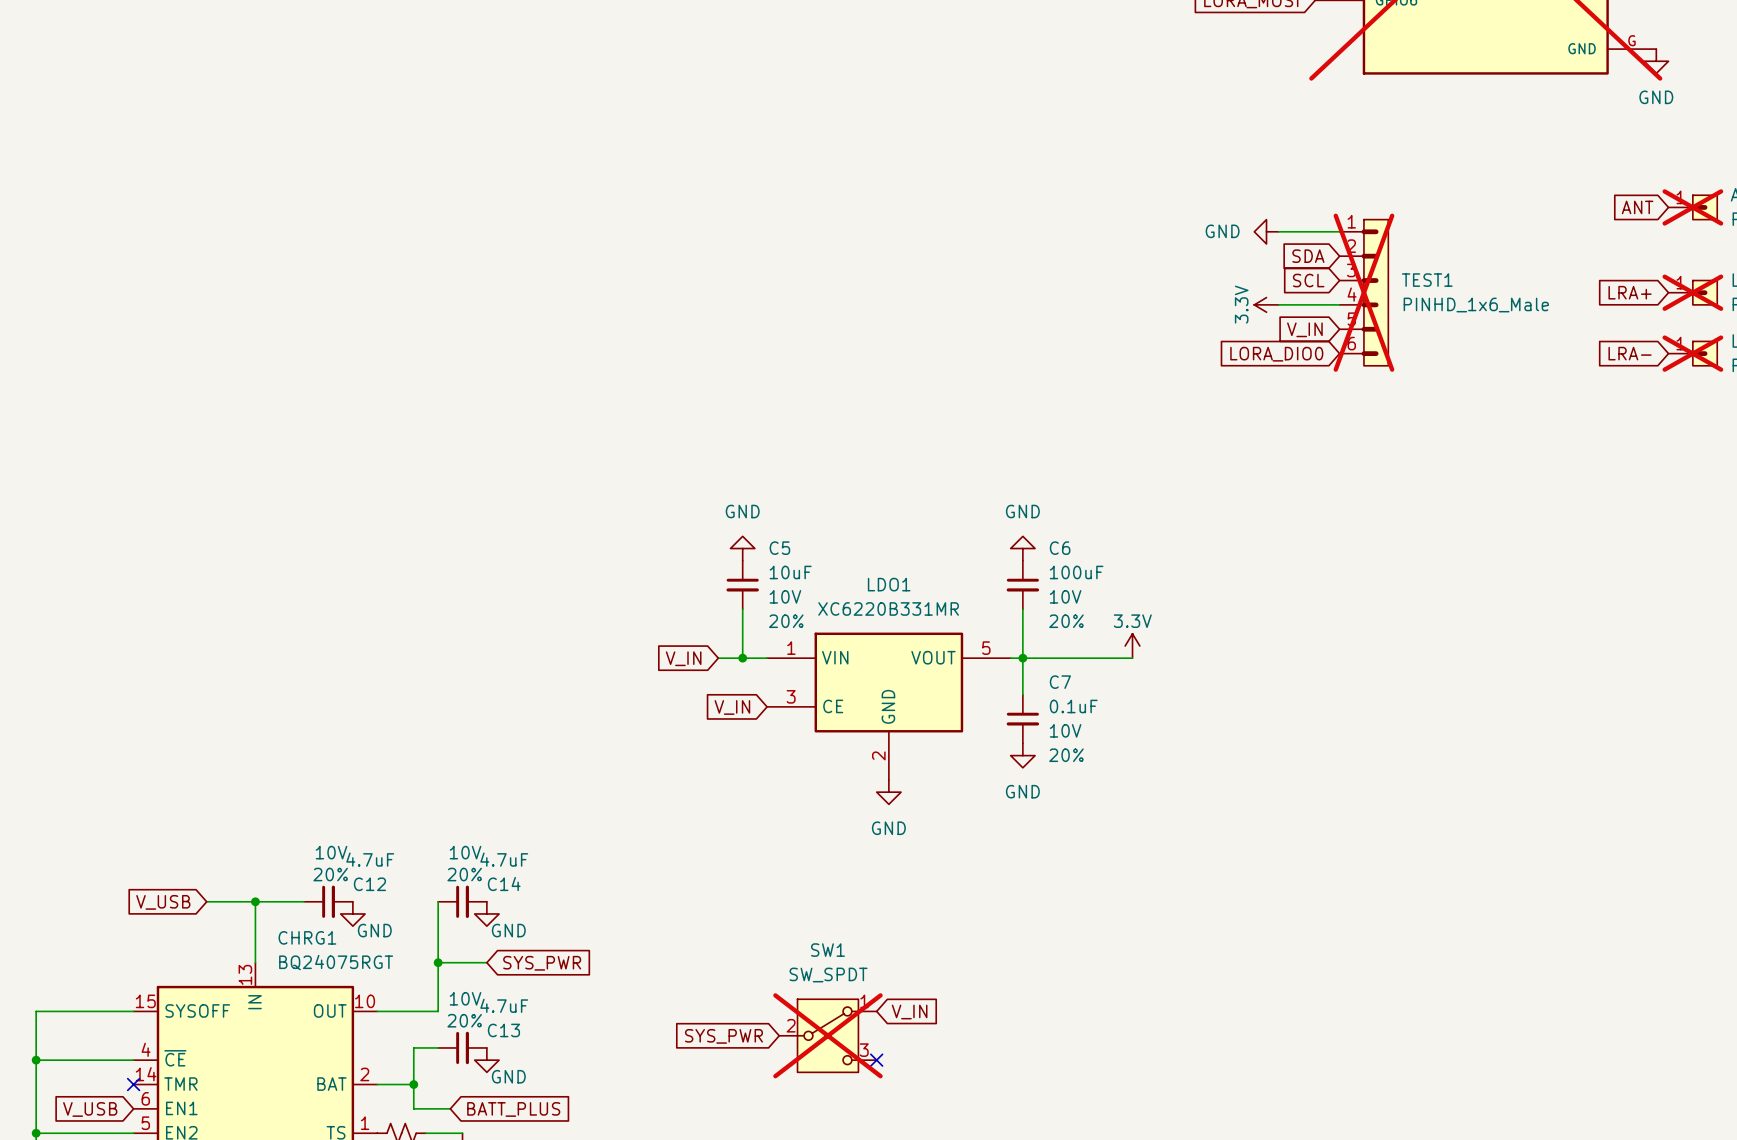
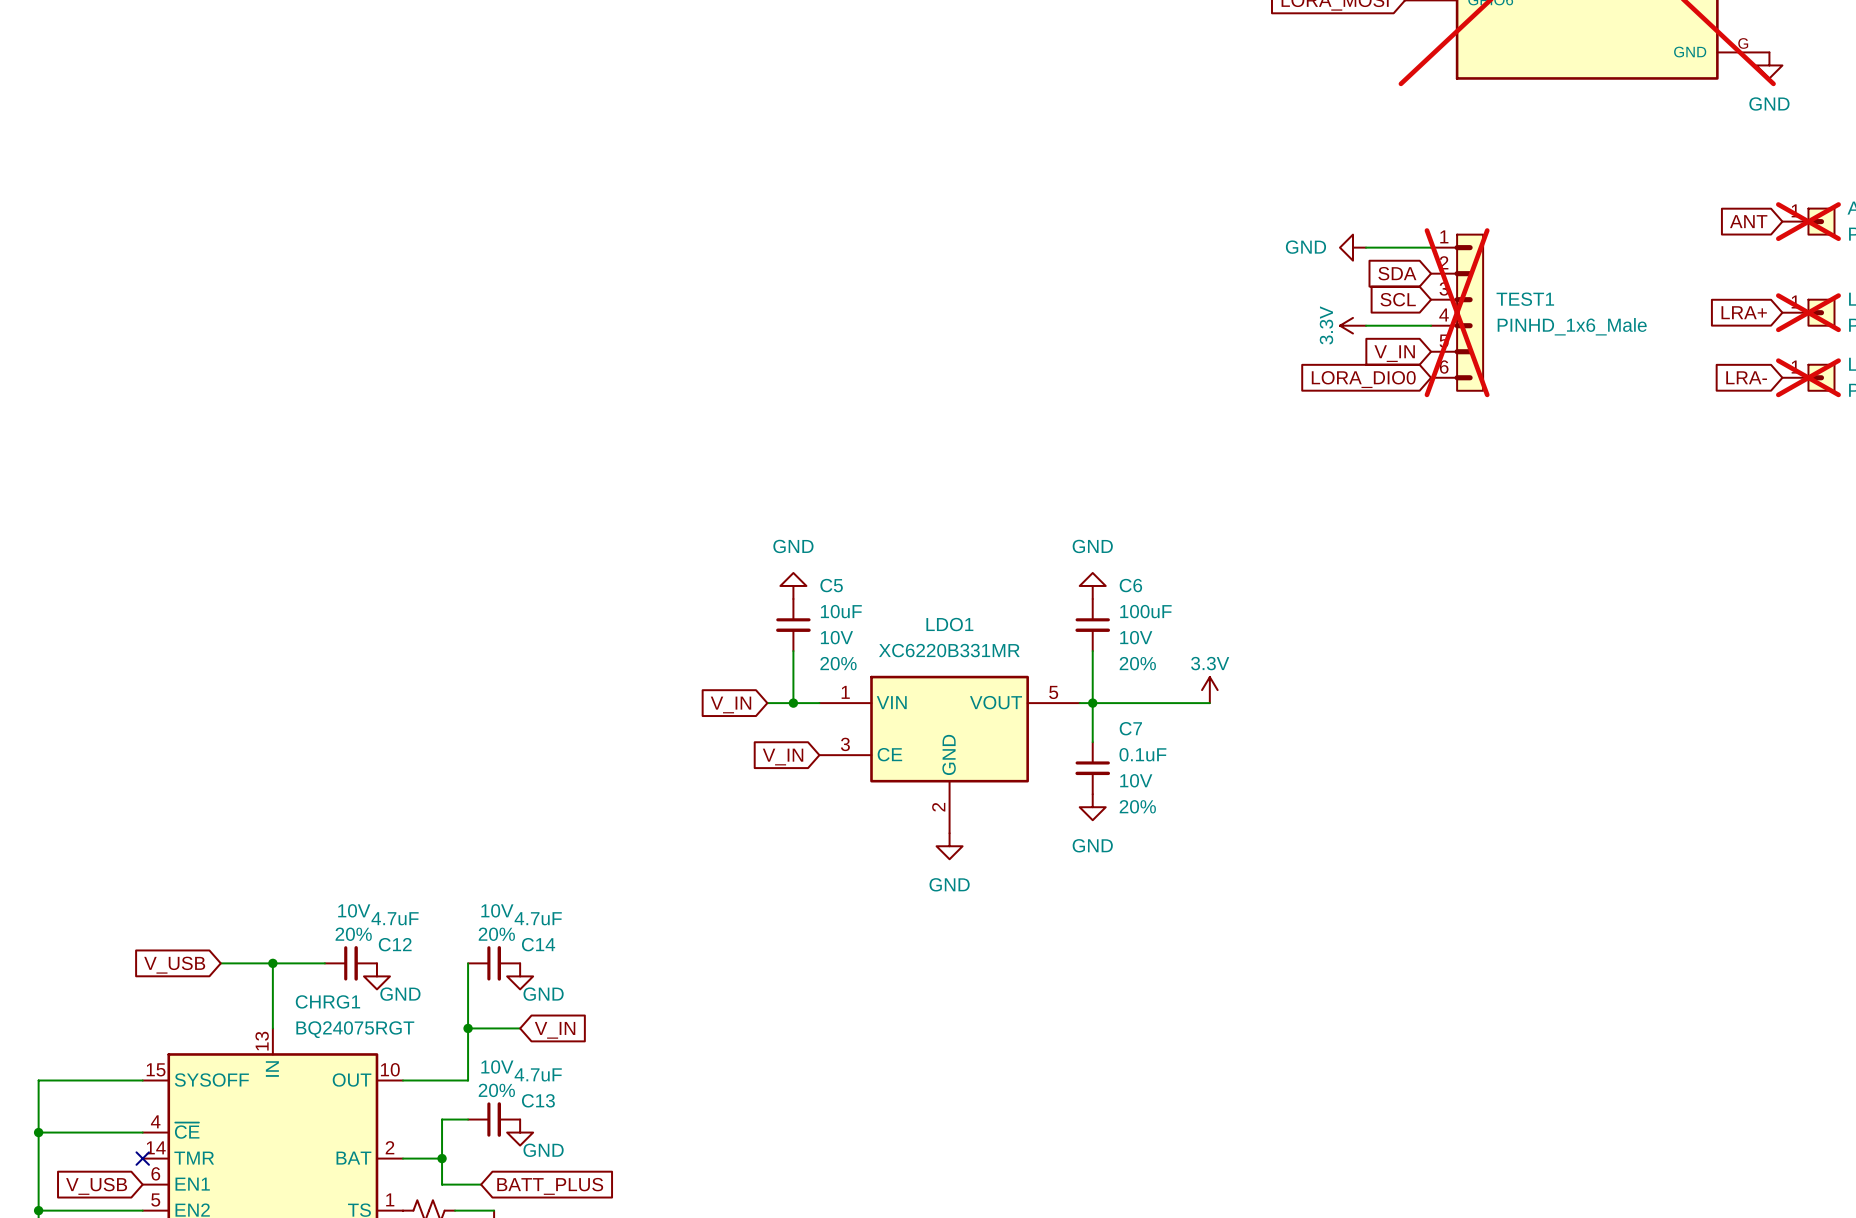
global label: SYS_PWR (542, 963) -> V_IN (555, 1030)
global label: V_IN (909, 1012) -> none
SW1: SW_SPDT (827, 1035) -> none
global label: SYS_PWR (723, 1036) -> none
no-connect mark: (876, 1060) -> none

